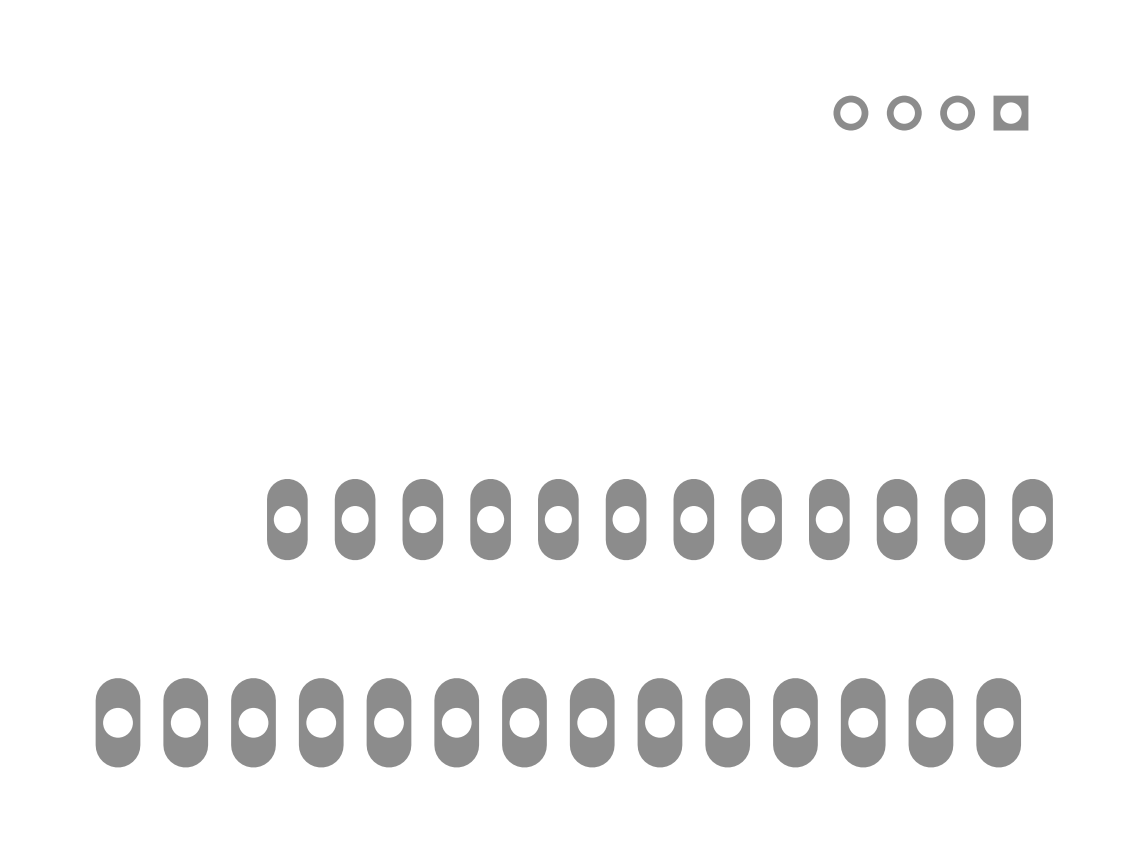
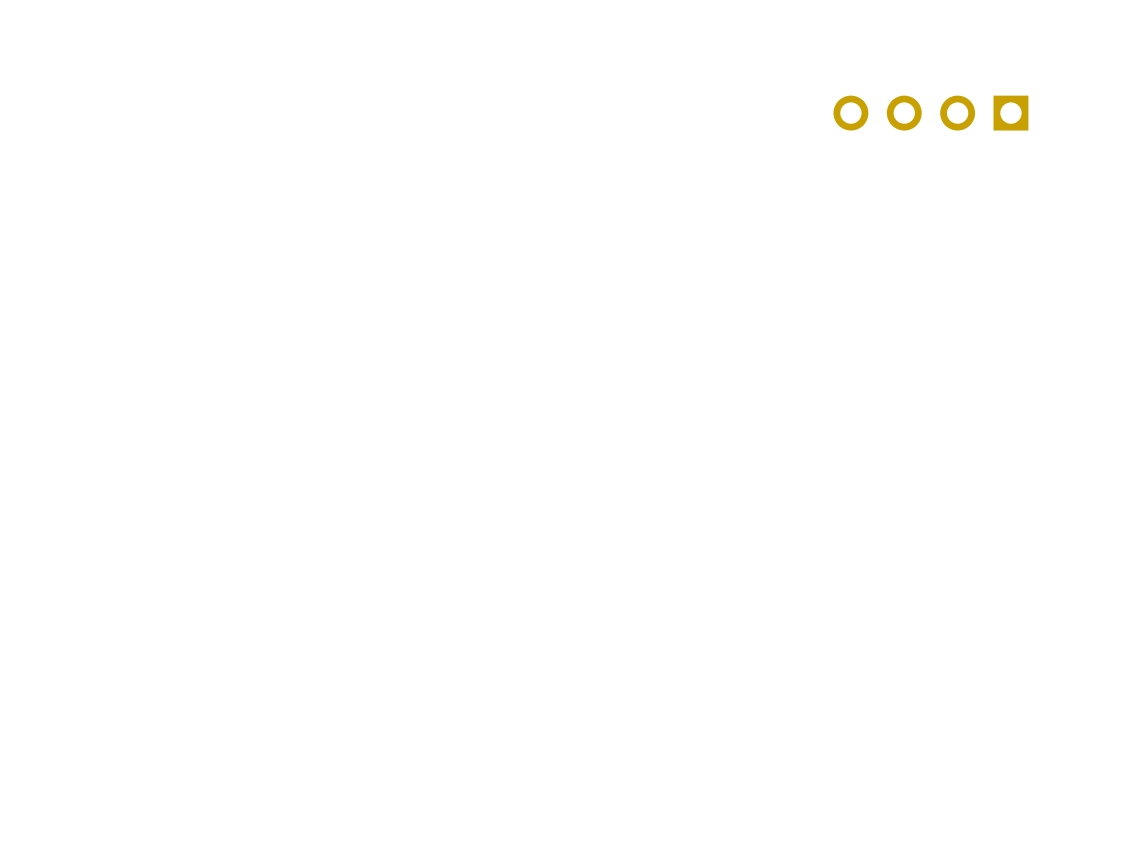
part: (659, 519) -> none
part: (558, 722) -> none

